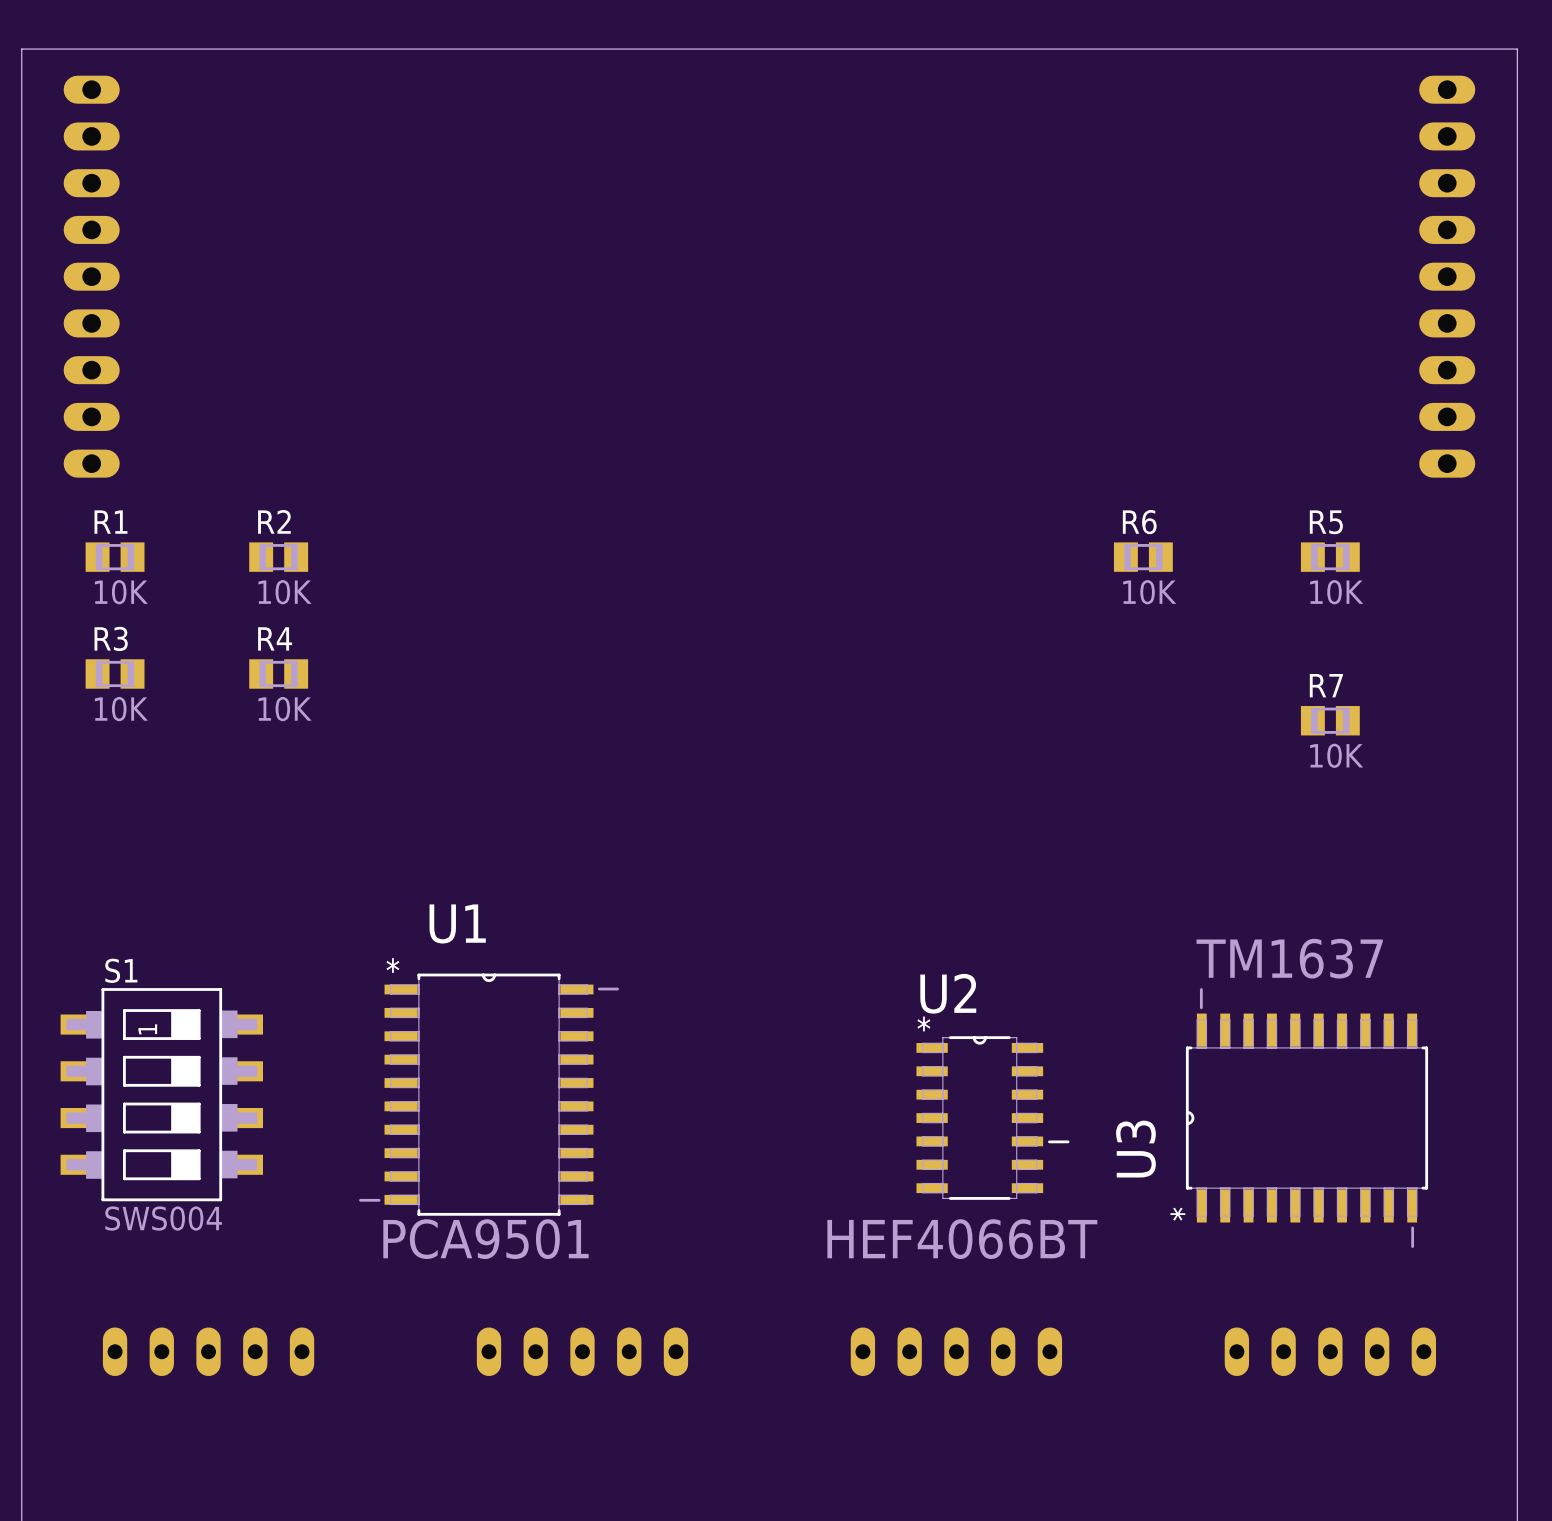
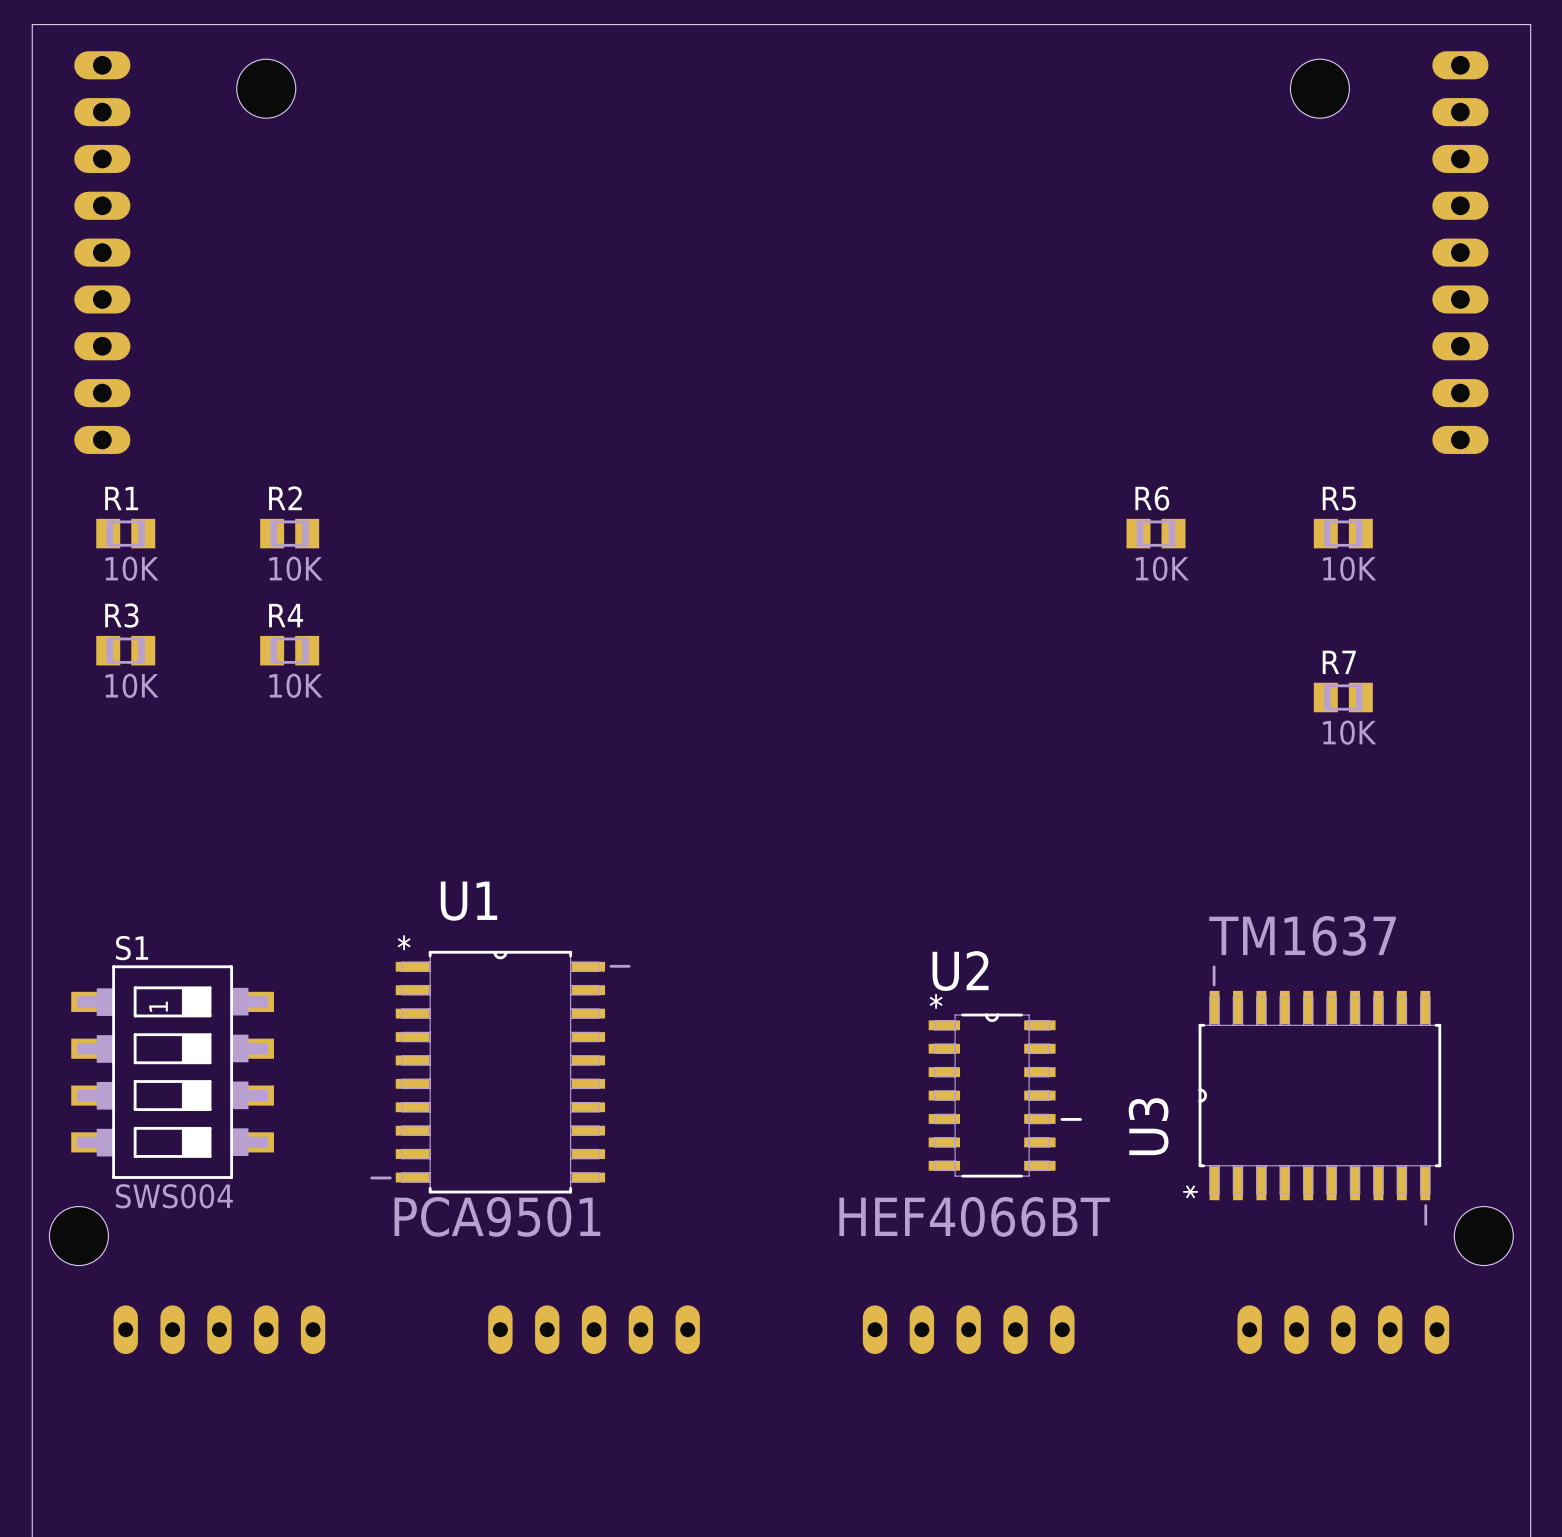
hole: none -> (266, 88)
hole: none -> (1319, 88)
hole: none -> (78, 1236)
hole: none -> (1483, 1236)

